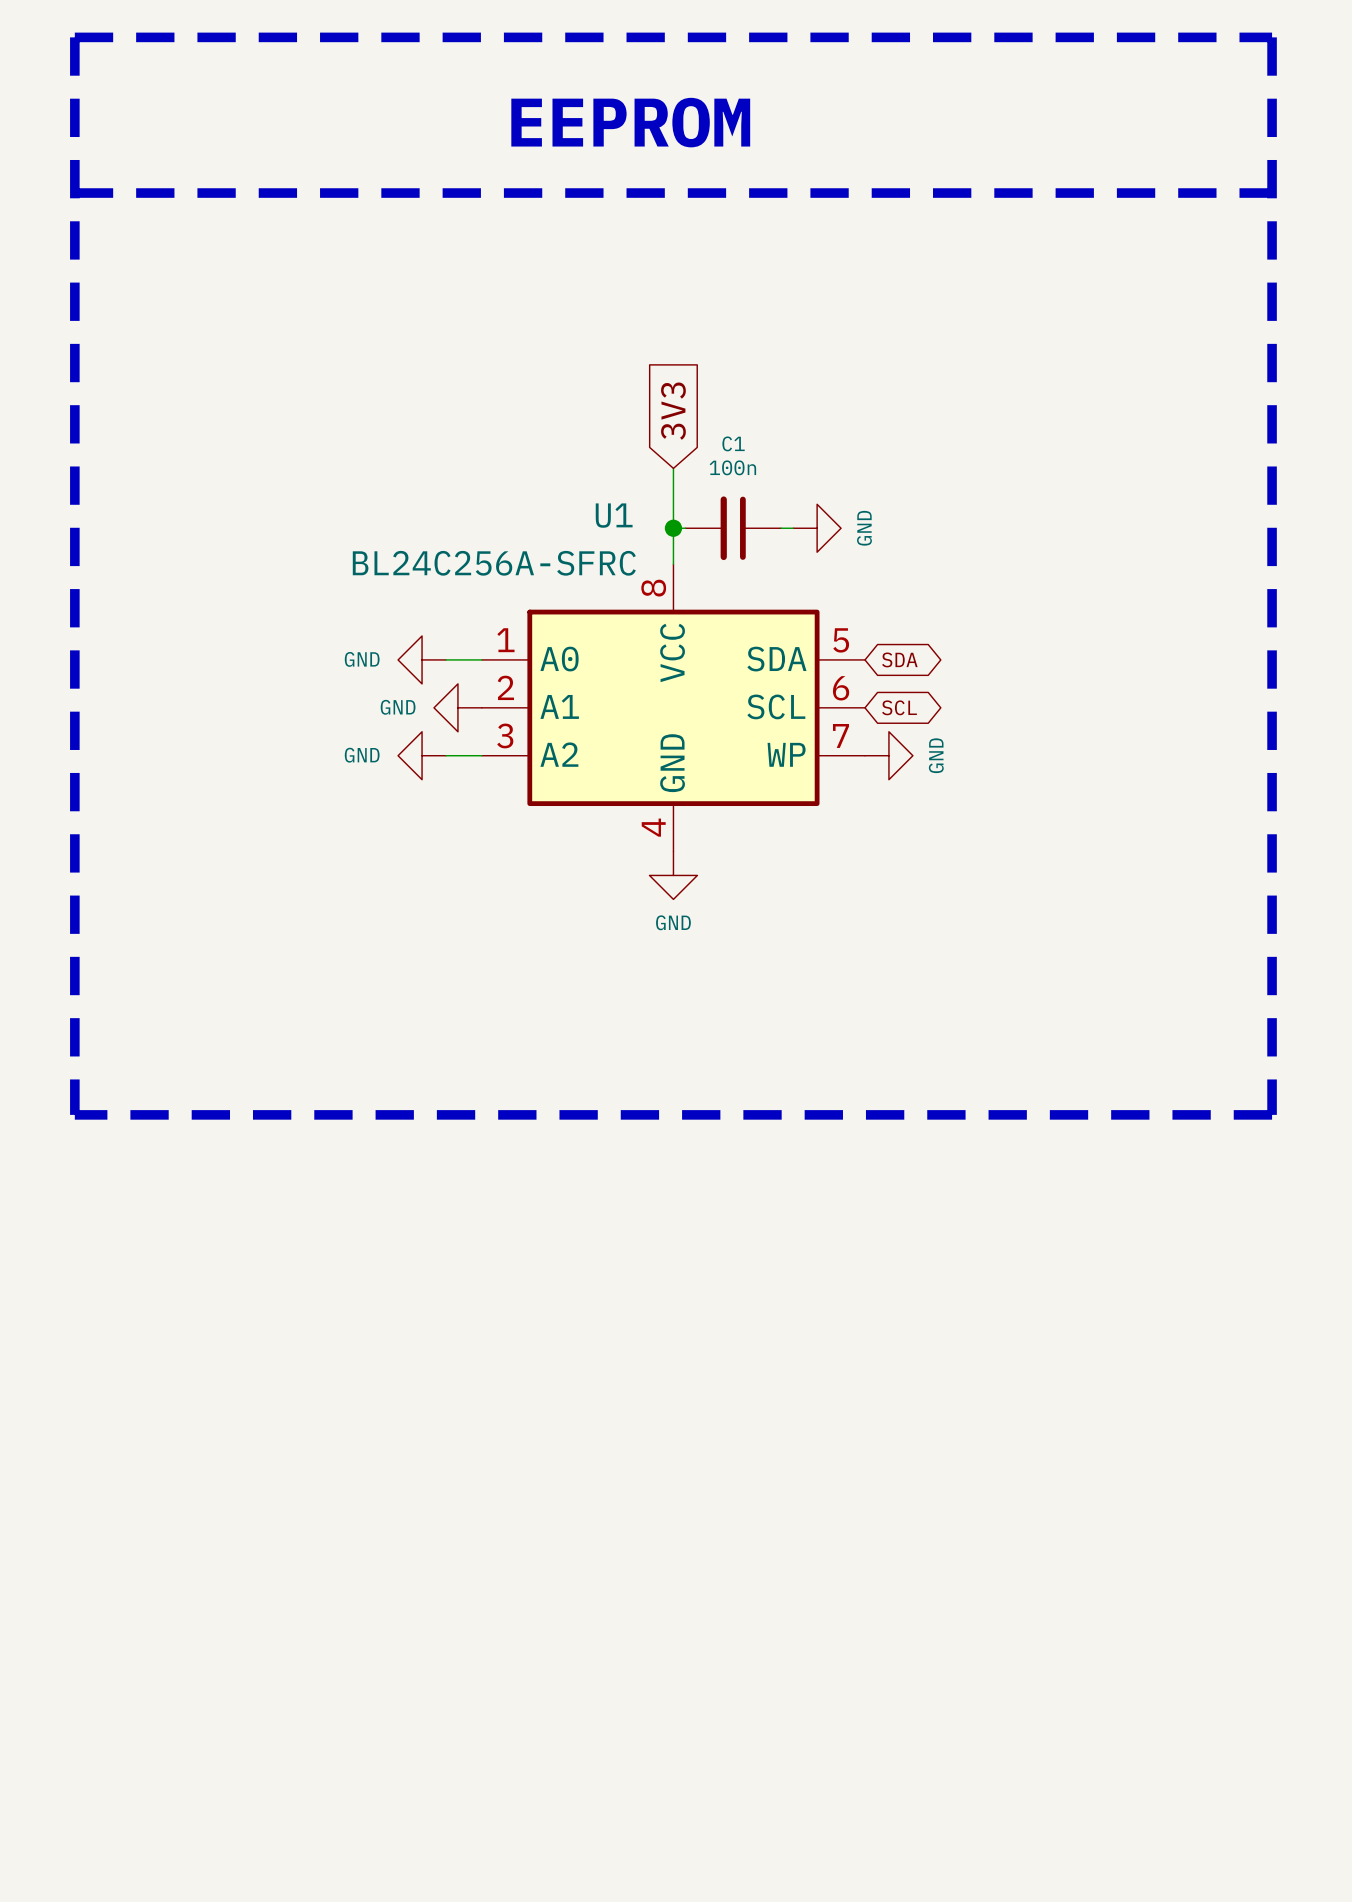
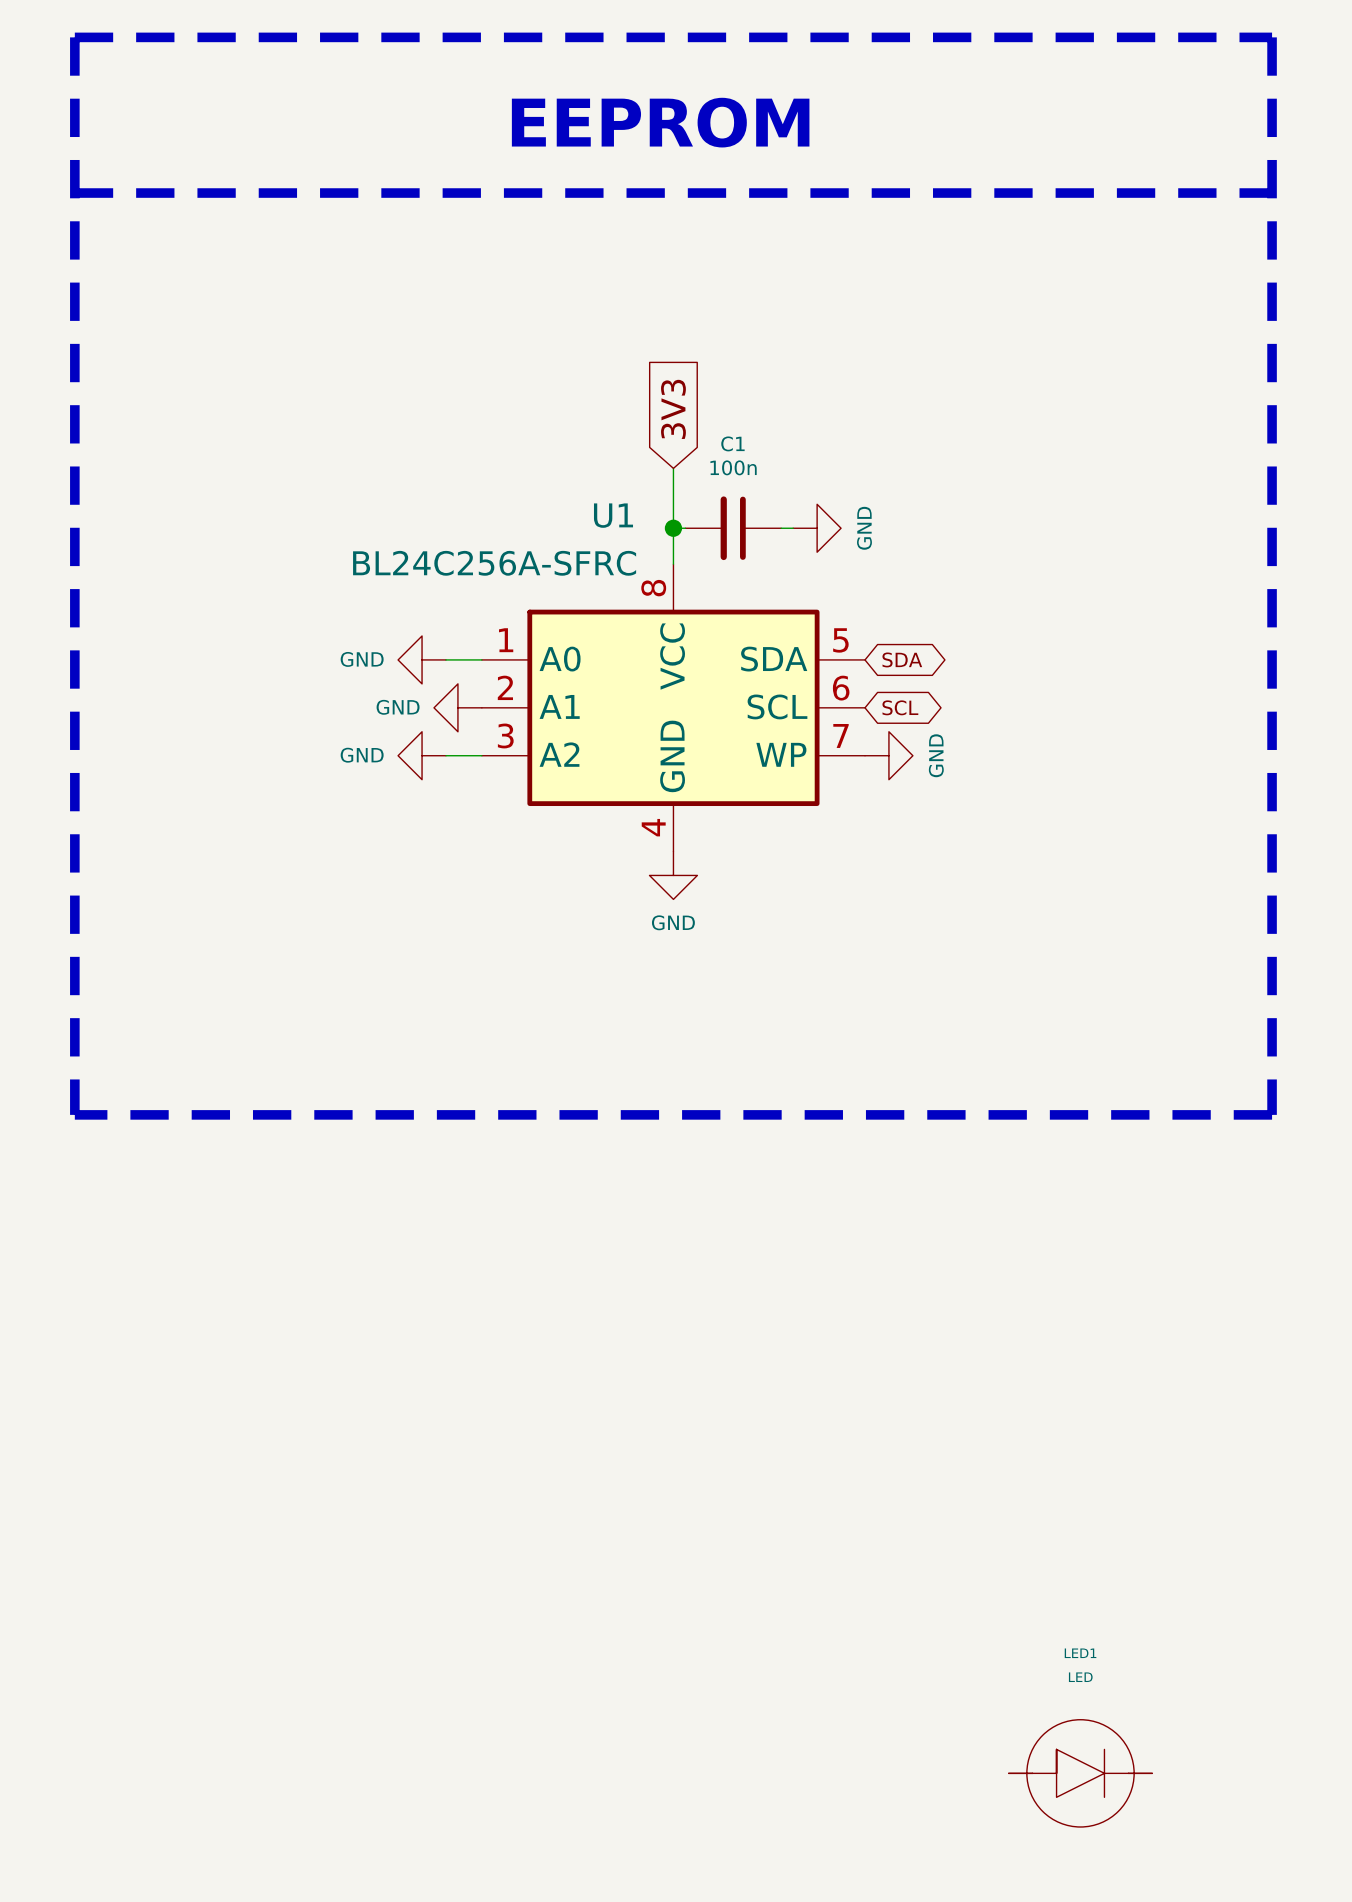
LED1: none -> LED (1080, 1773)

